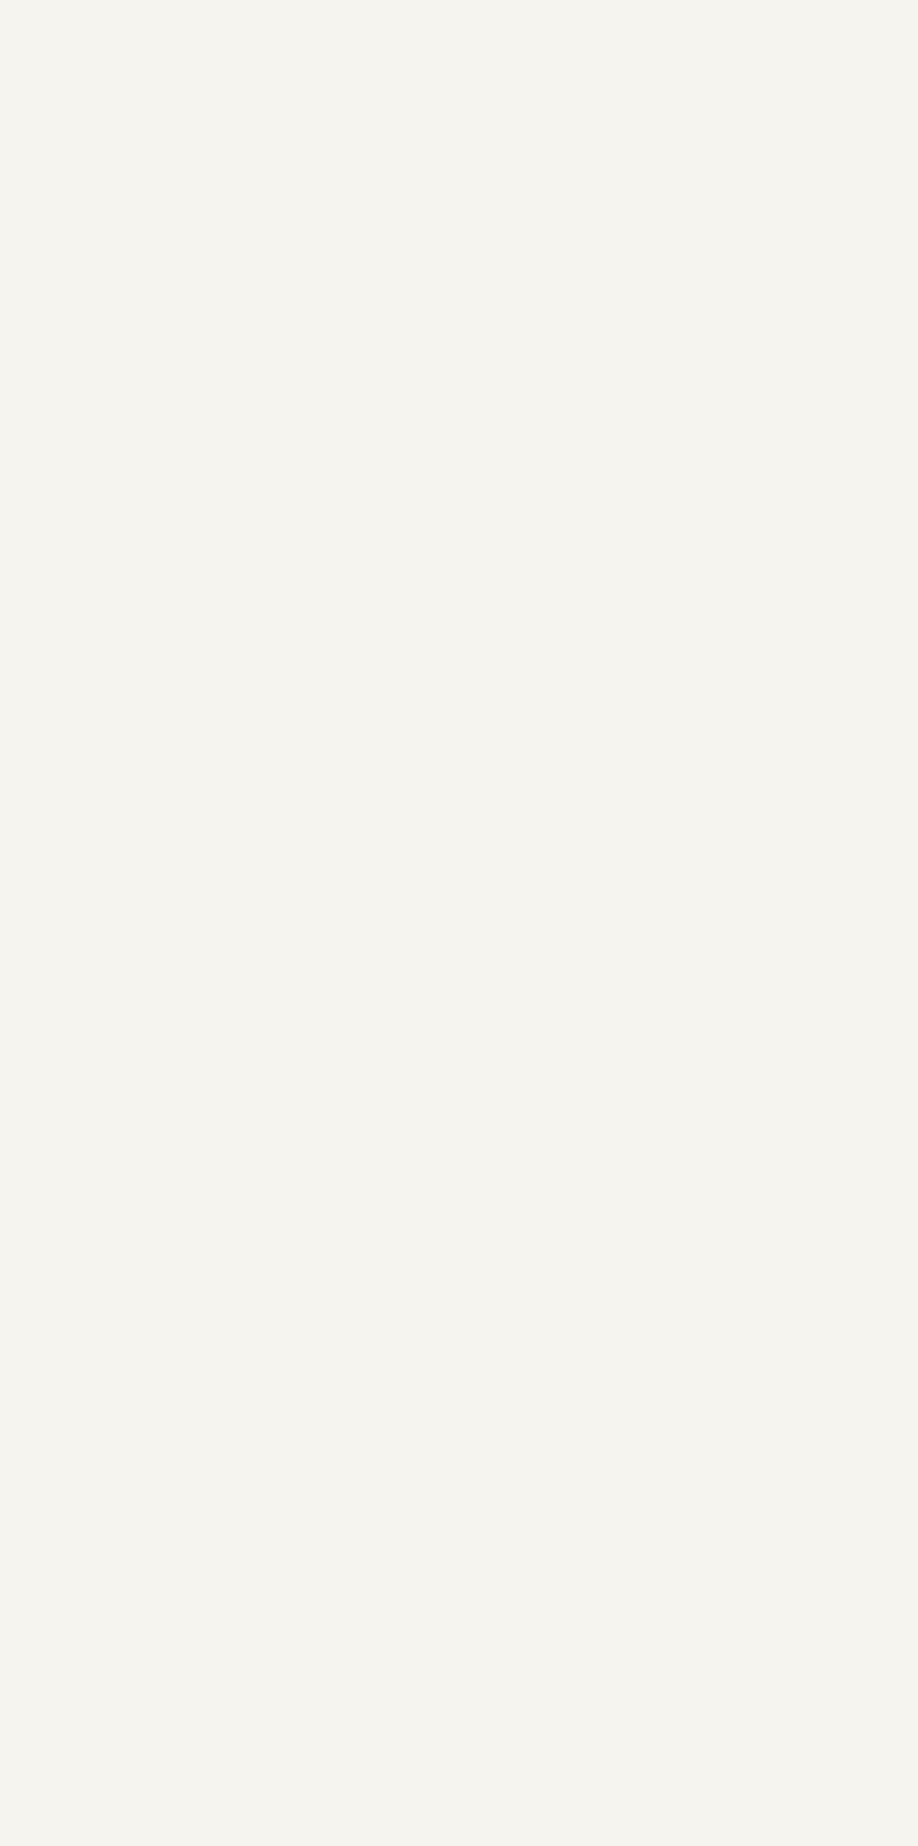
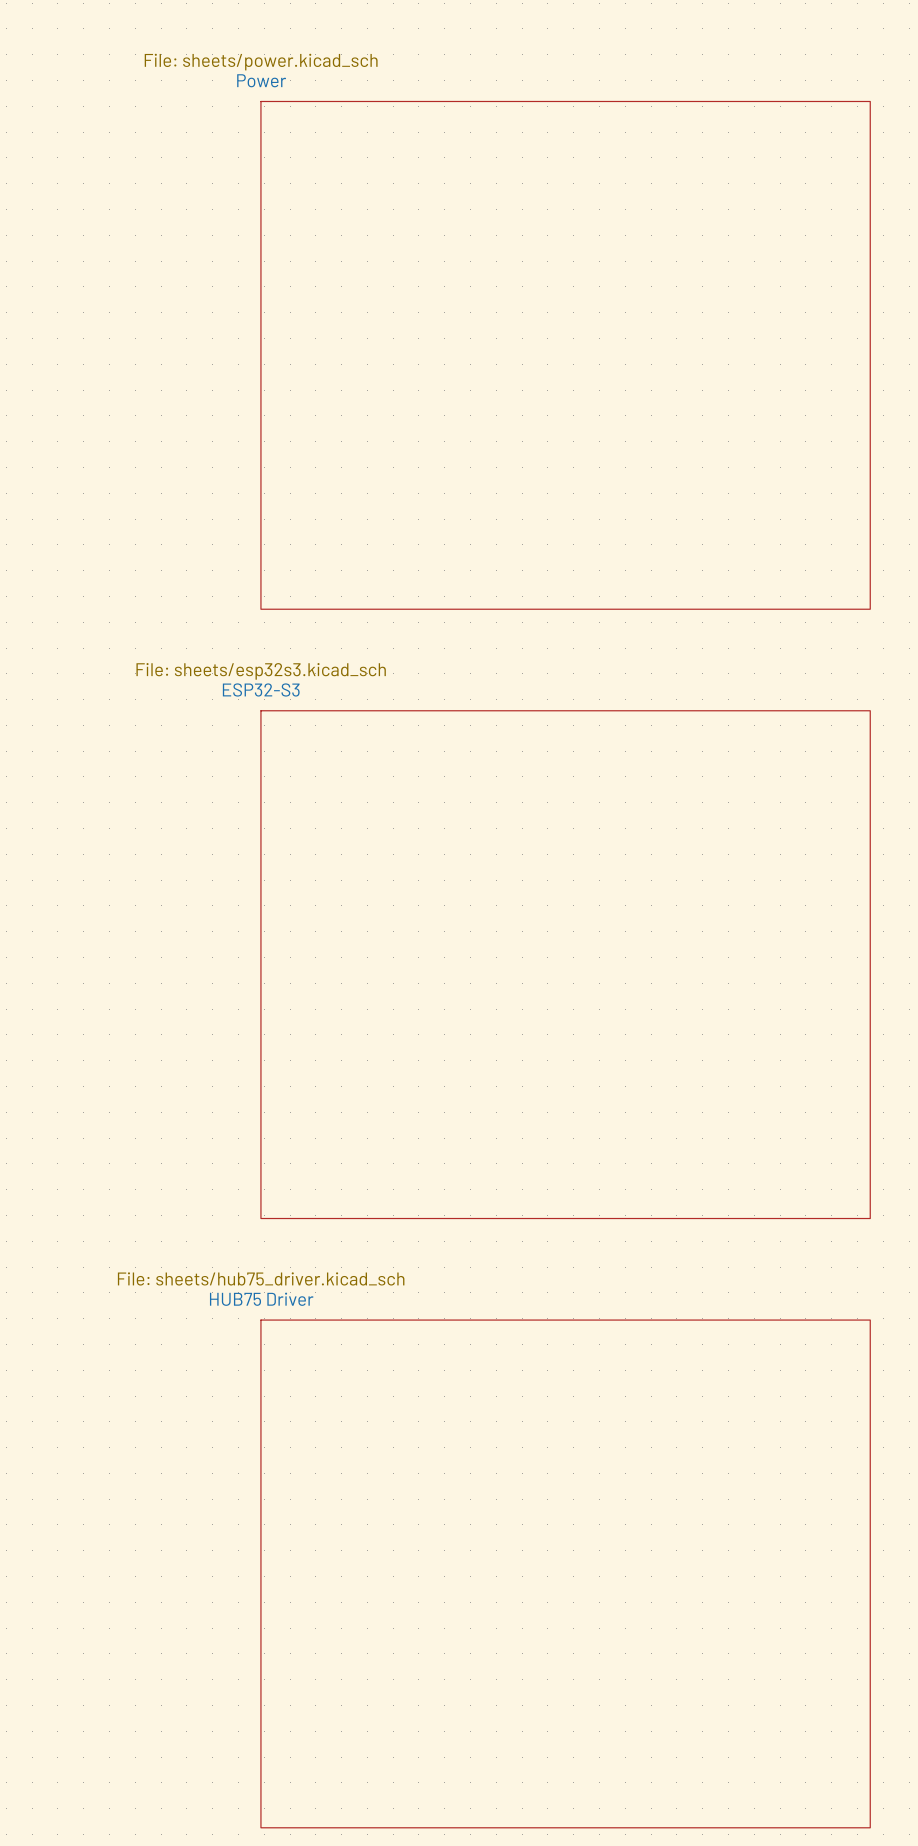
sheet Power: none -> File: sheets/power.kicad_sch (565, 355)
sheet ESP32-S3: none -> File: sheets/esp32s3.kicad_sch (565, 964)
sheet HUB75 Driver: none -> File: sheets/hub75_driver.kicad_sch (565, 1573)

